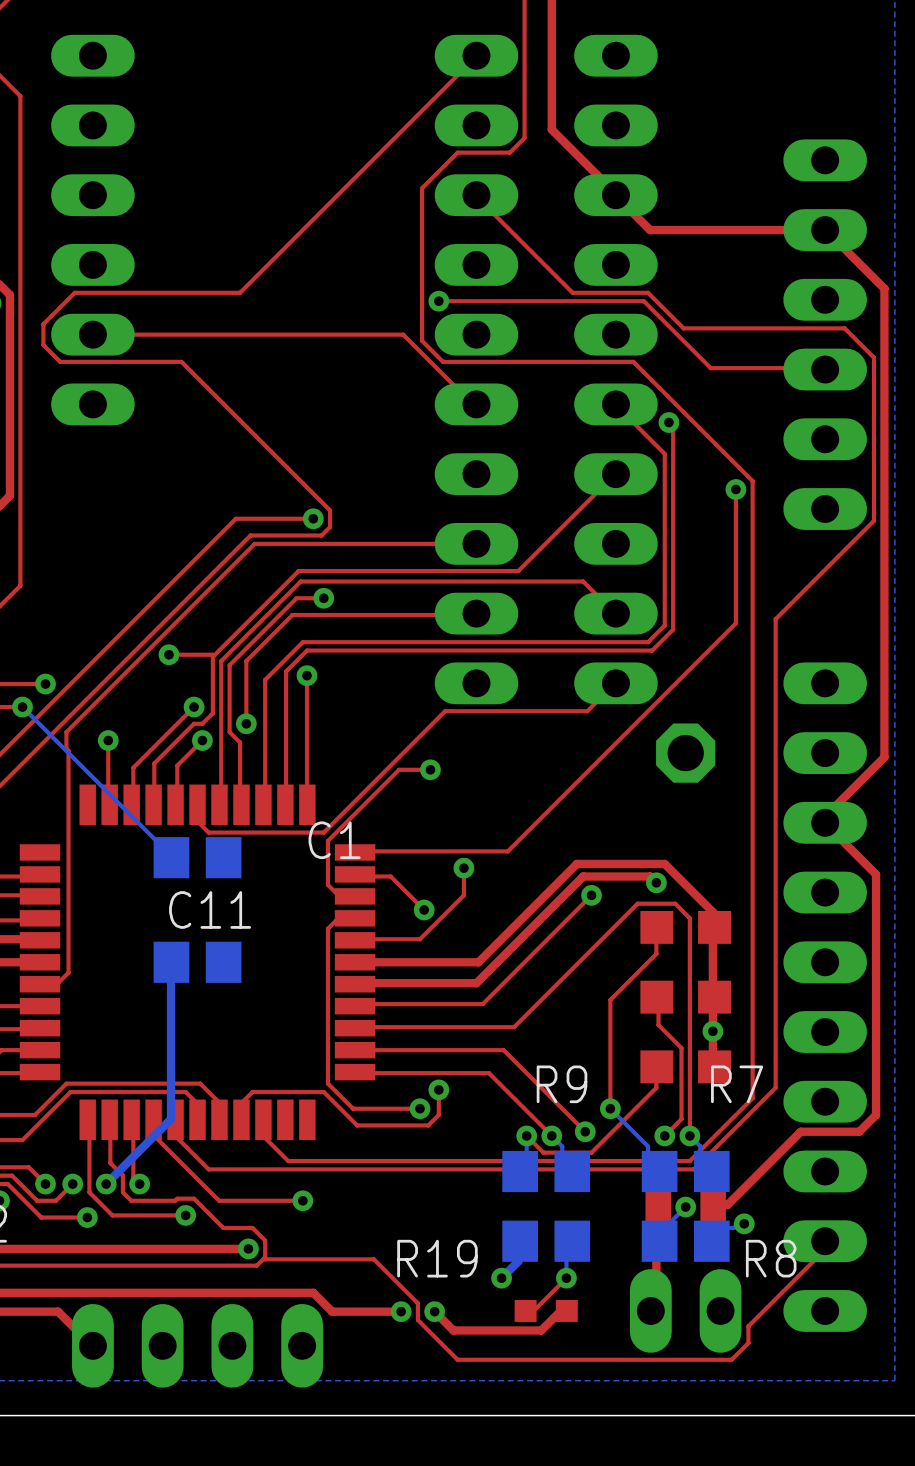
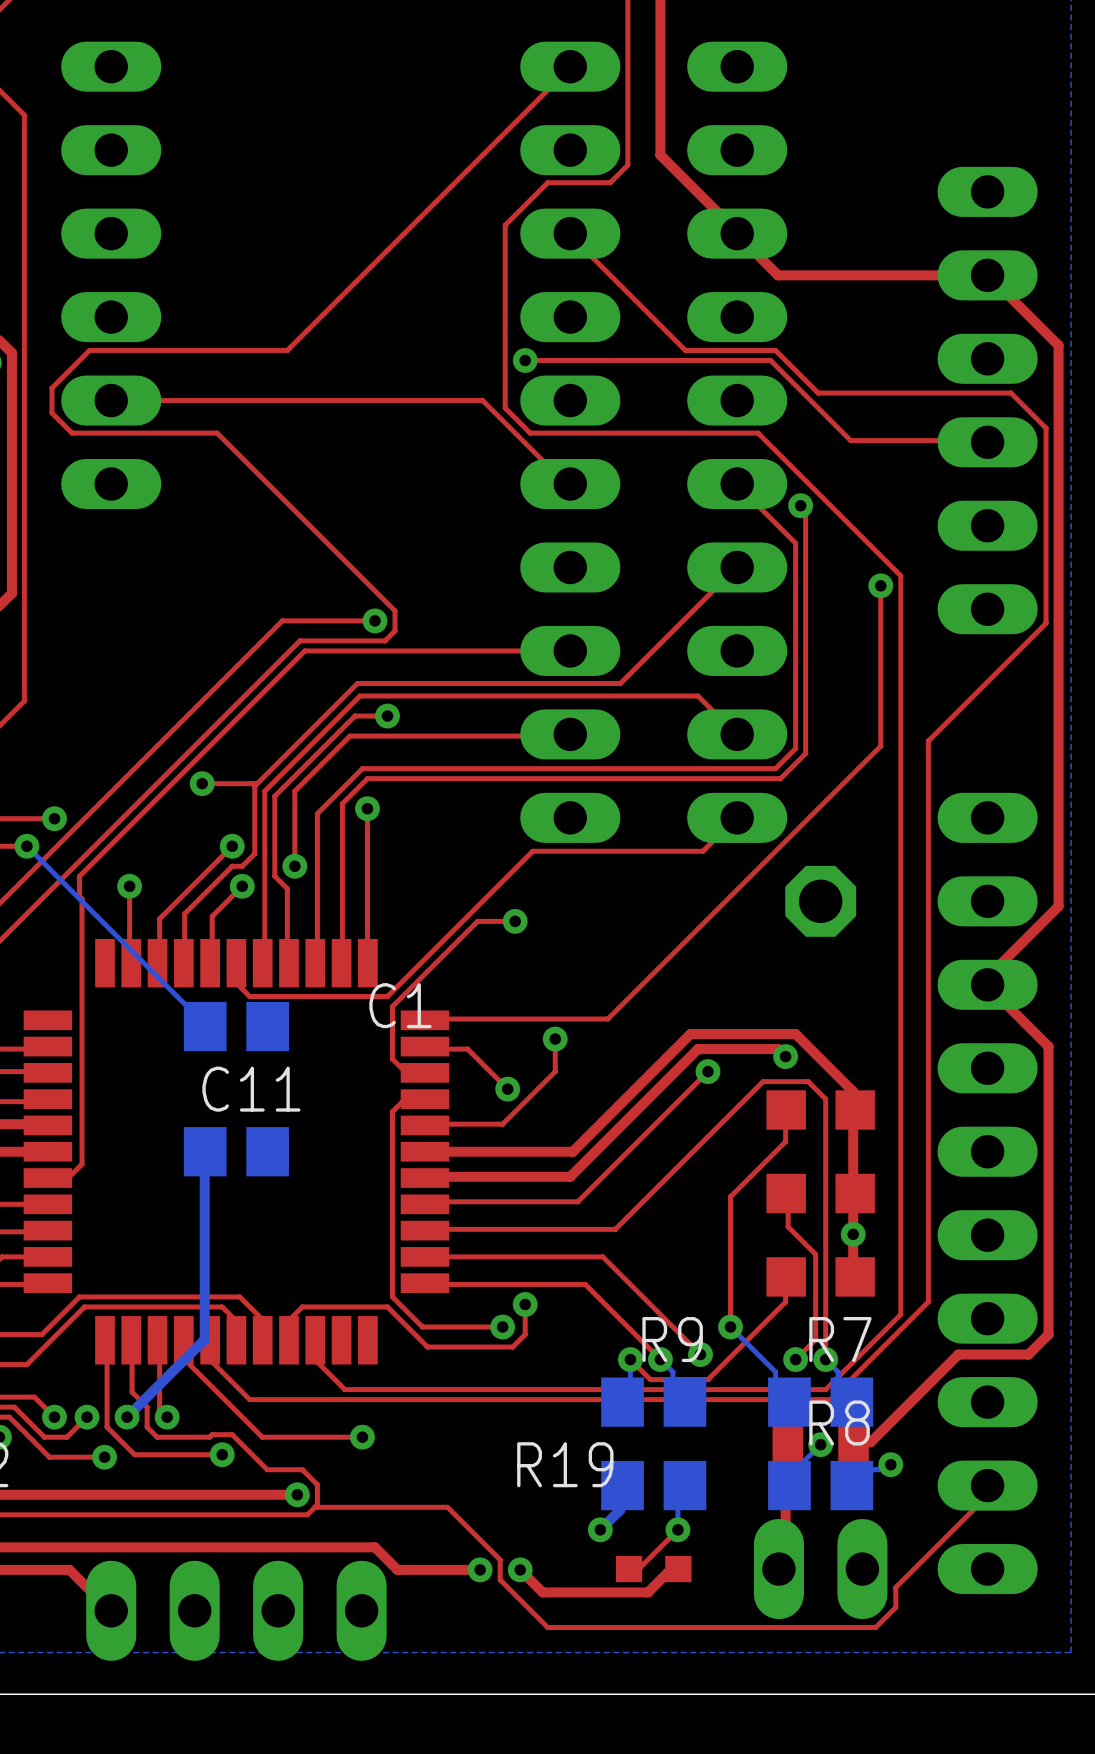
R9 name position: R9 (562, 1084) -> R9 (672, 1339)
R7 name position: R7 (737, 1084) -> R7 (840, 1339)
R19 name position: R19 (437, 1258) -> R19 (565, 1464)
R8 name position: R8 (771, 1258) -> R8 (839, 1422)

